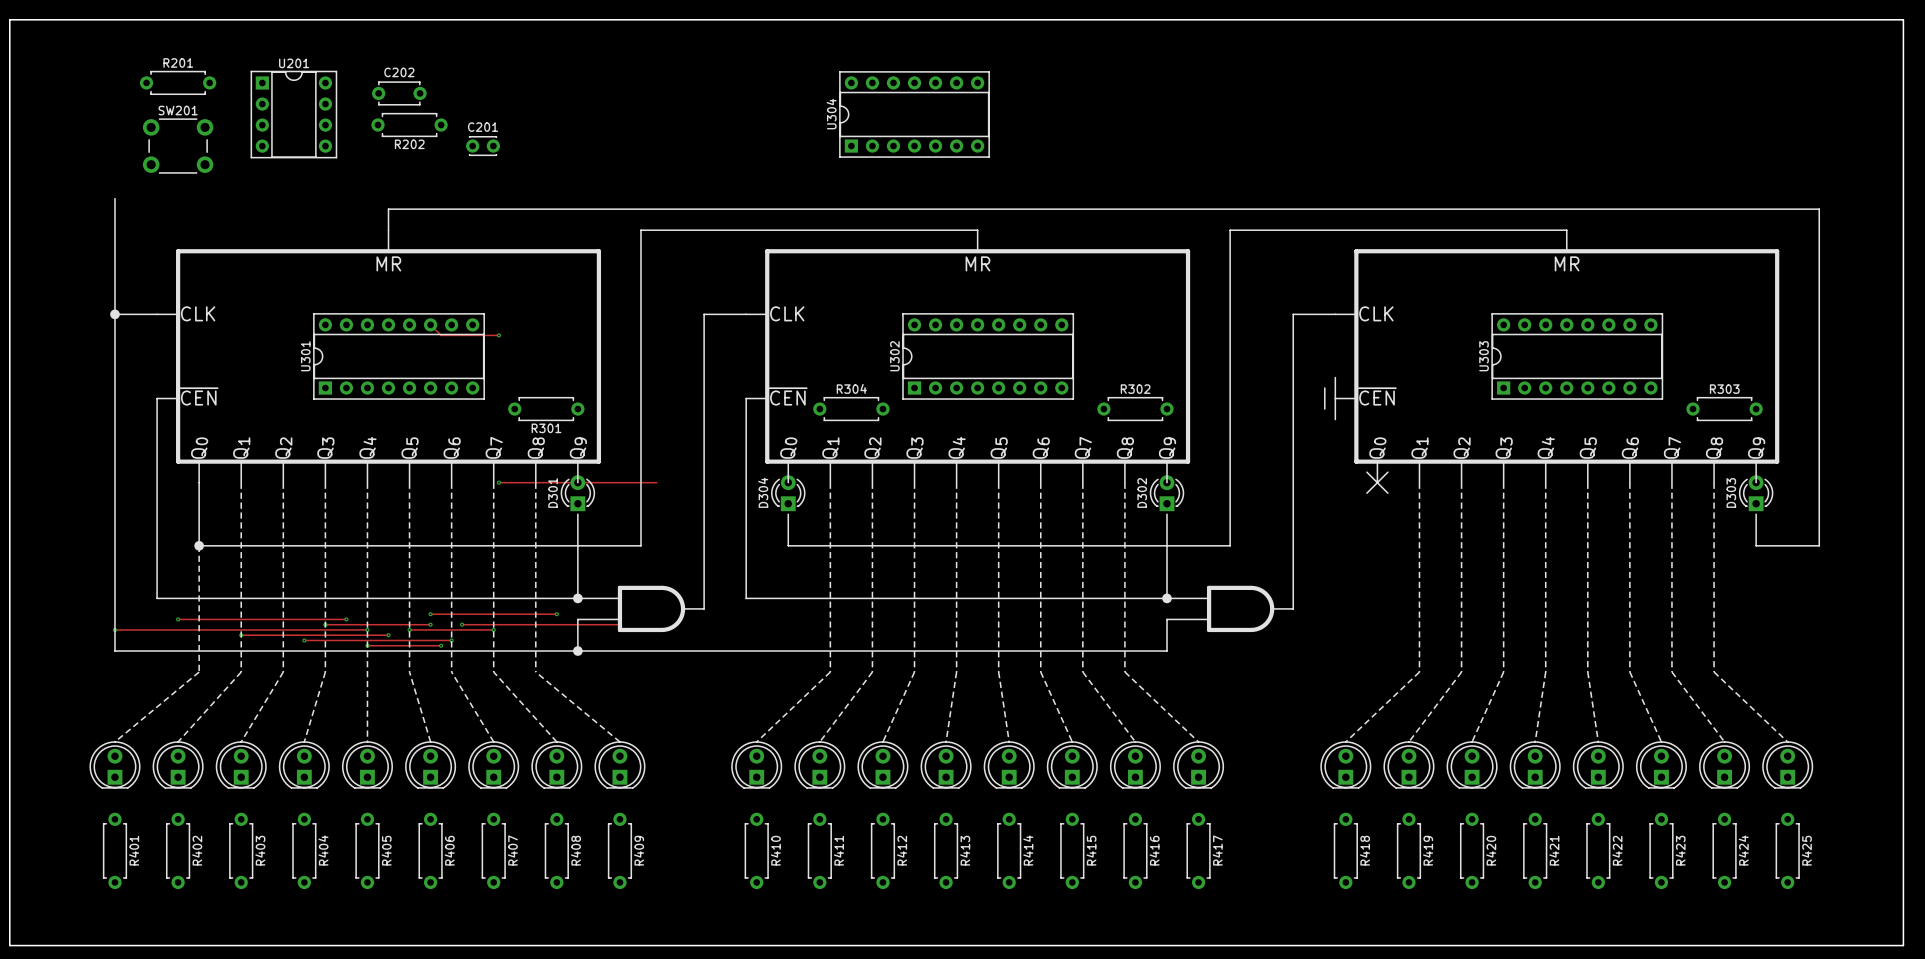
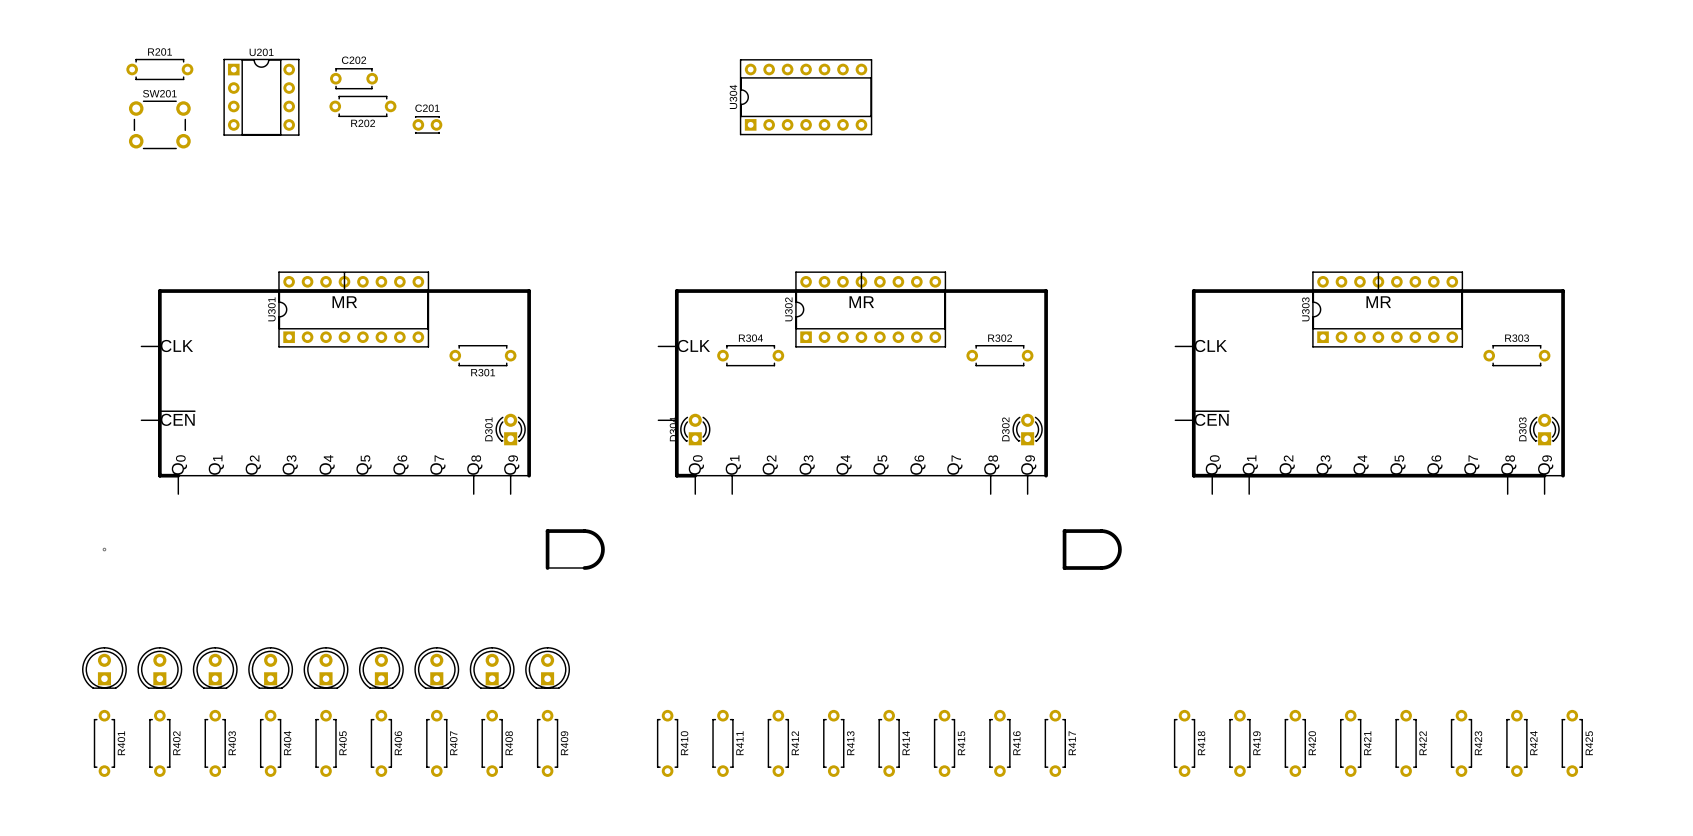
board edge: (9, 19) (1903, 19) (1903, 945) (9, 945) (9, 19) -> none
line: (114, 198) (114, 651) (619, 651) -> none
line: (388, 251) (388, 209) (1819, 209) (1819, 545) (1777, 545) -> (1563, 401) (1563, 475)
line: (977, 251) (977, 230) (640, 230) (640, 545) (598, 545) -> (529, 401) (529, 475)
line: (1566, 251) (1566, 230) (1230, 230) (1230, 545) (1188, 545) -> (1046, 401) (1046, 475)
text position: MR (388, 263) -> MR (344, 302)
text position: MR (977, 263) -> MR (861, 302)
text position: MR (1567, 263) -> MR (1378, 302)
drawing: [110, 309, 120, 320] -> none
text: CLK (198, 313) -> none
text: CLK (787, 313) -> none
text: CLK (1376, 313) -> none
line: (114, 314) (178, 314) -> none
line: none -> (344, 272) (344, 291)
line: (767, 314) (704, 314) (704, 608) (683, 608) -> none
line: none -> (861, 272) (861, 291)
line: (1356, 314) (1293, 314) (1293, 608) (1272, 608) -> none
line: none -> (1378, 272) (1378, 291)
track: (430, 324) (441, 335) (498, 335) -> none
line: (178, 335) (178, 251) (598, 251) (598, 335) -> (159, 291) (529, 291)
via: (498, 335) -> none
line: (767, 335) (767, 251) (1188, 251) (1188, 335) -> (676, 291) (1046, 291)
line: (1356, 335) (1356, 251) (1777, 251) (1777, 335) -> (1193, 291) (1563, 291)
line: (1335, 377) (1335, 419) -> none
line: (1324, 388) (1324, 409) -> (1212, 475) (1212, 494)
text: ~{CEN} (199, 396) -> CLK (176, 345)
text: ~{CEN} (788, 396) -> CLK (693, 345)
text: ~{CEN} (1377, 396) -> CLK (1210, 345)
line: (157, 398) (157, 598) (619, 598) -> none
line: (746, 398) (746, 598) (1209, 598) -> none
text position: Q4 (367, 447) -> Q4 (327, 464)
text position: Q7 (494, 447) -> Q7 (437, 465)
text position: Q4 (957, 447) -> Q4 (844, 464)
text position: Q7 (1083, 447) -> Q7 (954, 465)
text position: Q4 (1546, 447) -> Q4 (1361, 464)
text position: Q7 (1672, 447) -> Q7 (1471, 465)
text position: Q0 (199, 448) -> Q0 (179, 465)
text position: Q1 (241, 448) -> Q1 (216, 465)
text position: Q2 (283, 448) -> Q2 (253, 465)
text position: Q3 (325, 448) -> Q3 (290, 465)
text position: Q5 (410, 448) -> Q5 (364, 465)
text position: Q6 (452, 448) -> Q6 (400, 465)
text position: Q8 (536, 448) -> Q8 (474, 465)
text position: Q9 (578, 448) -> Q9 (511, 465)
text position: Q0 (788, 448) -> Q0 (696, 465)
text position: Q1 (830, 448) -> Q1 (733, 465)
text position: Q2 (872, 448) -> Q2 (770, 465)
text position: Q3 (915, 448) -> Q3 (807, 465)
text position: Q5 (999, 448) -> Q5 (881, 465)
text position: Q6 (1041, 448) -> Q6 (917, 465)
text position: Q8 (1125, 448) -> Q8 (991, 465)
text position: Q9 (1167, 448) -> Q9 (1028, 465)
text position: Q0 (1377, 448) -> Q0 (1213, 465)
text position: Q1 (1419, 448) -> Q1 (1250, 465)
text position: Q2 (1462, 448) -> Q2 (1287, 465)
text position: Q3 (1504, 448) -> Q3 (1324, 465)
text position: Q5 (1588, 448) -> Q5 (1397, 465)
text position: Q6 (1630, 448) -> Q6 (1434, 465)
text position: Q8 (1714, 448) -> Q8 (1508, 465)
text position: Q9 (1756, 448) -> Q9 (1545, 465)
line: (178, 461) (598, 461) -> (159, 401) (159, 475) (178, 475) (178, 494)
line: (199, 461) (199, 672) (114, 741) -> none
line: (241, 461) (241, 672) (178, 741) -> none
line: (283, 461) (283, 672) (241, 741) -> none
line: (325, 461) (325, 672) (304, 741) -> none
line: (367, 461) (367, 741) -> none
line: (409, 461) (409, 672) (430, 741) -> none
line: (451, 461) (451, 672) (493, 741) -> none
line: (493, 461) (493, 672) (556, 741) -> none
line: (535, 461) (535, 672) (619, 741) -> none
line: (577, 461) (577, 482) -> (473, 475) (473, 494)
line: (767, 461) (1188, 461) -> (676, 401) (676, 475) (695, 475) (695, 494)
line: (788, 461) (788, 482) -> (732, 475) (732, 494)
line: (830, 461) (830, 672) (756, 741) -> none
line: (872, 461) (872, 672) (819, 741) -> none
line: (914, 461) (914, 672) (882, 741) -> none
line: (956, 461) (956, 672) (946, 741) -> none
line: (998, 461) (998, 672) (1009, 741) -> none
line: (1040, 461) (1040, 672) (1072, 741) -> none
line: (1082, 461) (1082, 672) (1135, 741) -> none
line: (1124, 461) (1124, 672) (1198, 741) -> none
line: (1167, 461) (1167, 482) -> (990, 475) (990, 494)
line: (1356, 461) (1777, 461) -> (1193, 401) (1193, 475) (1544, 475) (1544, 494)
line: (1377, 461) (1377, 482) -> (1249, 475) (1249, 494)
line: (1419, 461) (1419, 672) (1345, 741) -> none
line: (1461, 461) (1461, 672) (1408, 741) -> none
line: (1503, 461) (1503, 672) (1472, 741) -> none
line: (1545, 461) (1545, 672) (1535, 741) -> none
line: (1587, 461) (1587, 672) (1598, 741) -> none
line: (1629, 461) (1629, 672) (1661, 741) -> none
line: (1671, 461) (1671, 672) (1724, 741) -> none
line: (1714, 461) (1714, 672) (1787, 741) -> none
line: (1756, 461) (1756, 482) -> (1507, 475) (1507, 494)
line: (1366, 472) (1387, 493) -> none
line: (1387, 472) (1366, 493) -> none
text: none -> ~{CEN} (177, 418)
text: none -> ~{CEN} (1211, 418)
line: none -> (141, 420) (159, 420)
track: (498, 482) (656, 482) -> none
via: (498, 482) -> none
line: none -> (658, 420) (676, 420)
line: none -> (1175, 420) (1193, 420)
line: (577, 514) (577, 545) -> none
line: (788, 514) (788, 545) -> none
line: (1167, 514) (1167, 545) -> none
line: (1756, 514) (1756, 545) -> none
drawing: [194, 540, 204, 551] -> none
line: (577, 566) (577, 598) -> none
line: (1167, 566) (1167, 598) -> none
drawing: [573, 593, 583, 604] -> none
drawing: [1162, 593, 1172, 604] -> none
line: (619, 608) (619, 587) (667, 588) (678, 596) (683, 608) (678, 621) (667, 629) (619, 629) -> (547, 568) (547, 549)
line: (1209, 608) (1209, 587) (1256, 588) (1267, 596) (1272, 608) (1267, 621) (1256, 629) (1209, 629) -> (1064, 531) (1106, 531) (1116, 538) (1119, 549) (1114, 562) (1101, 568) (1064, 568) (1064, 549)
track: (430, 614) (556, 614) -> none
via: (430, 614) -> none
via: (556, 614) -> none
track: (178, 619) (346, 619) -> none
via: (178, 619) -> none
via: (346, 619) -> none
line: (619, 619) (577, 619) (577, 651) -> none
line: (1209, 619) (1167, 619) (1167, 651) (662, 651) -> (547, 531) (586, 531) (598, 537) (602, 545) (601, 556) (594, 564) (584, 568)
track: (325, 624) (430, 624) -> none
via: (325, 624) -> none
via: (430, 624) -> none
track: (462, 624) (619, 624) -> none
via: (462, 624) -> none
track: (114, 629) (367, 629) -> none
via: (367, 629) -> none
track: (409, 629) (493, 629) -> none
via: (409, 629) -> none
via: (493, 629) -> none
track: (241, 635) (388, 635) -> none
via: (241, 635) -> none
via: (388, 635) -> none
track: (304, 640) (451, 640) -> none
via: (304, 640) -> none
via: (451, 640) -> none
track: (367, 645) (441, 645) -> none
via: (367, 645) -> none
via: (441, 645) -> none
drawing: [573, 646, 583, 656] -> none
part: (756, 764) -> none
part: (819, 764) -> none
part: (882, 764) -> none
part: (946, 764) -> none
part: (1009, 764) -> none
part: (1072, 764) -> none
part: (1135, 764) -> none
part: (1198, 764) -> none
part: (1345, 764) -> none
part: (1408, 764) -> none
part: (1472, 764) -> none
part: (1535, 764) -> none
part: (1598, 764) -> none
part: (1661, 764) -> none
part: (1724, 764) -> none
part: (1787, 764) -> none

